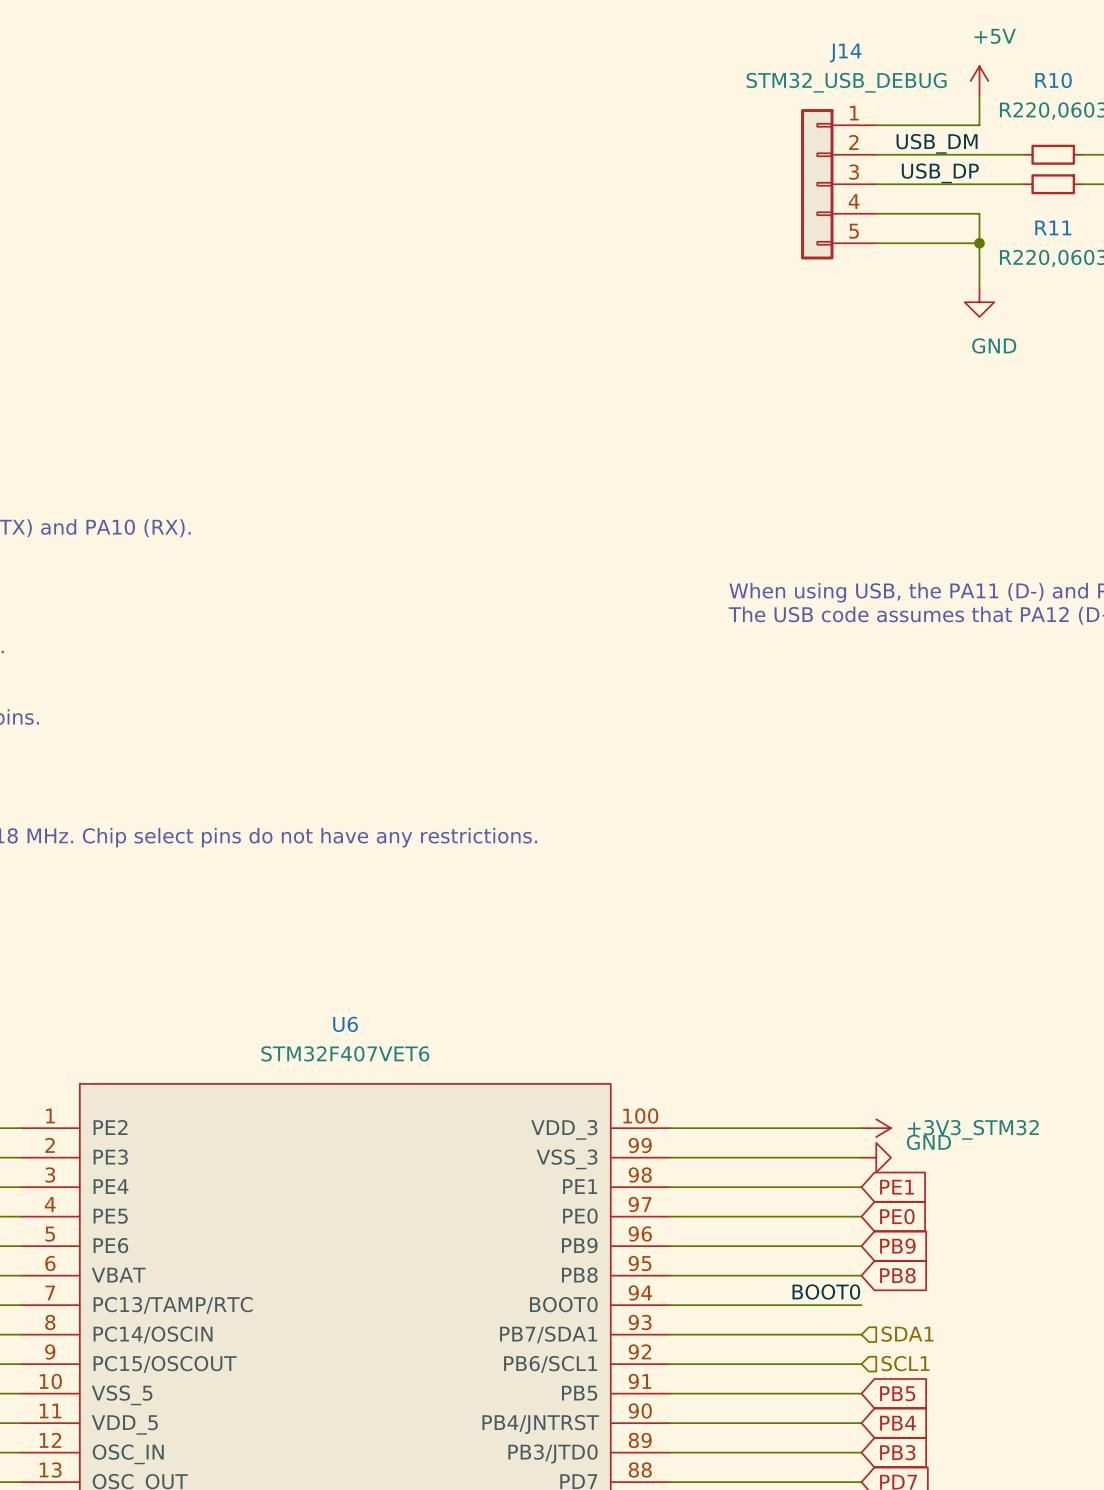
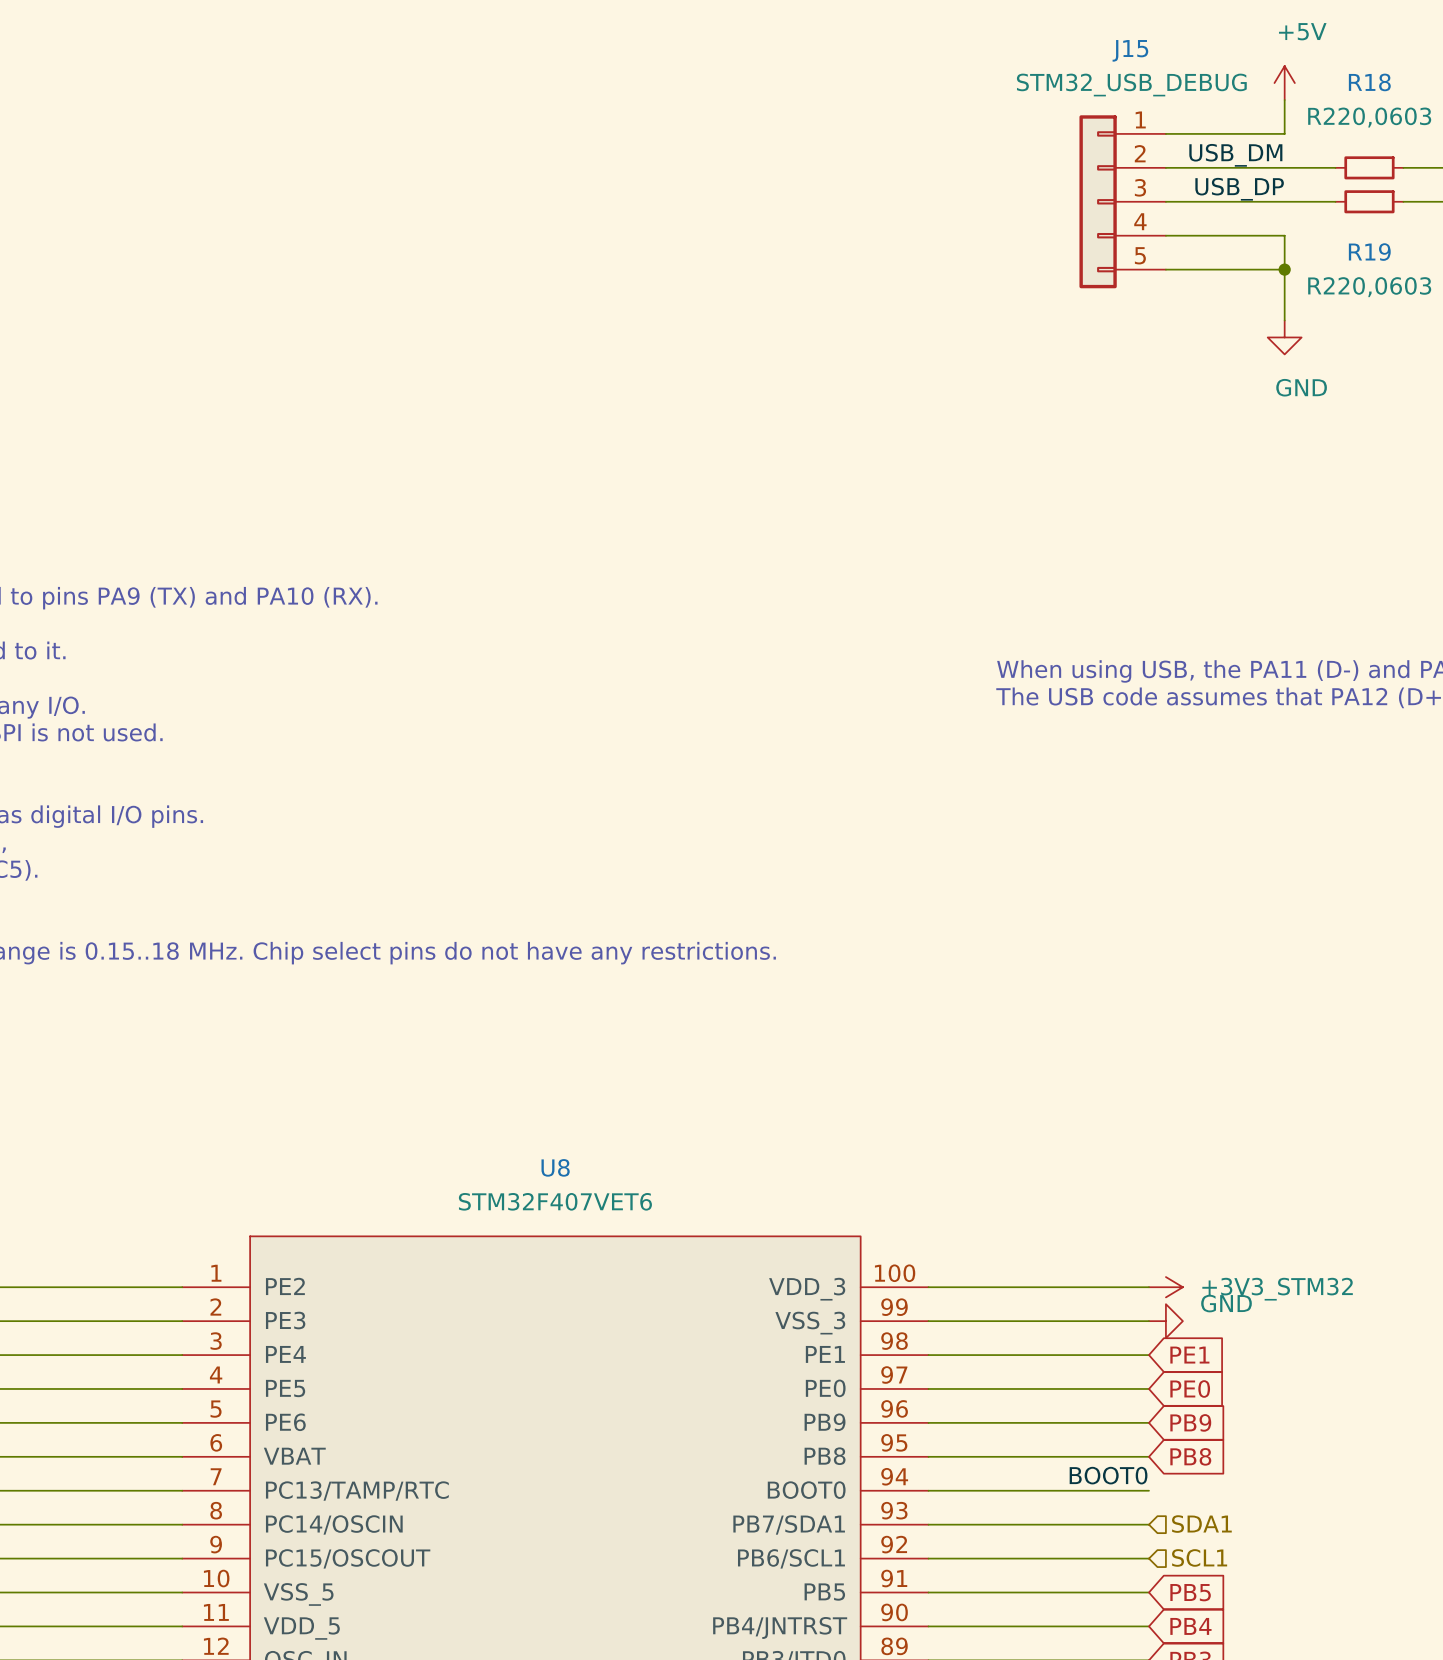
J14 name: J14 (845, 52) -> J15 (1130, 50)
R10 name: R10 (1053, 80) -> R18 (1369, 82)
R11 name: R11 (1053, 227) -> R19 (1369, 252)
U6 name: U6 (345, 1024) -> U8 (555, 1167)

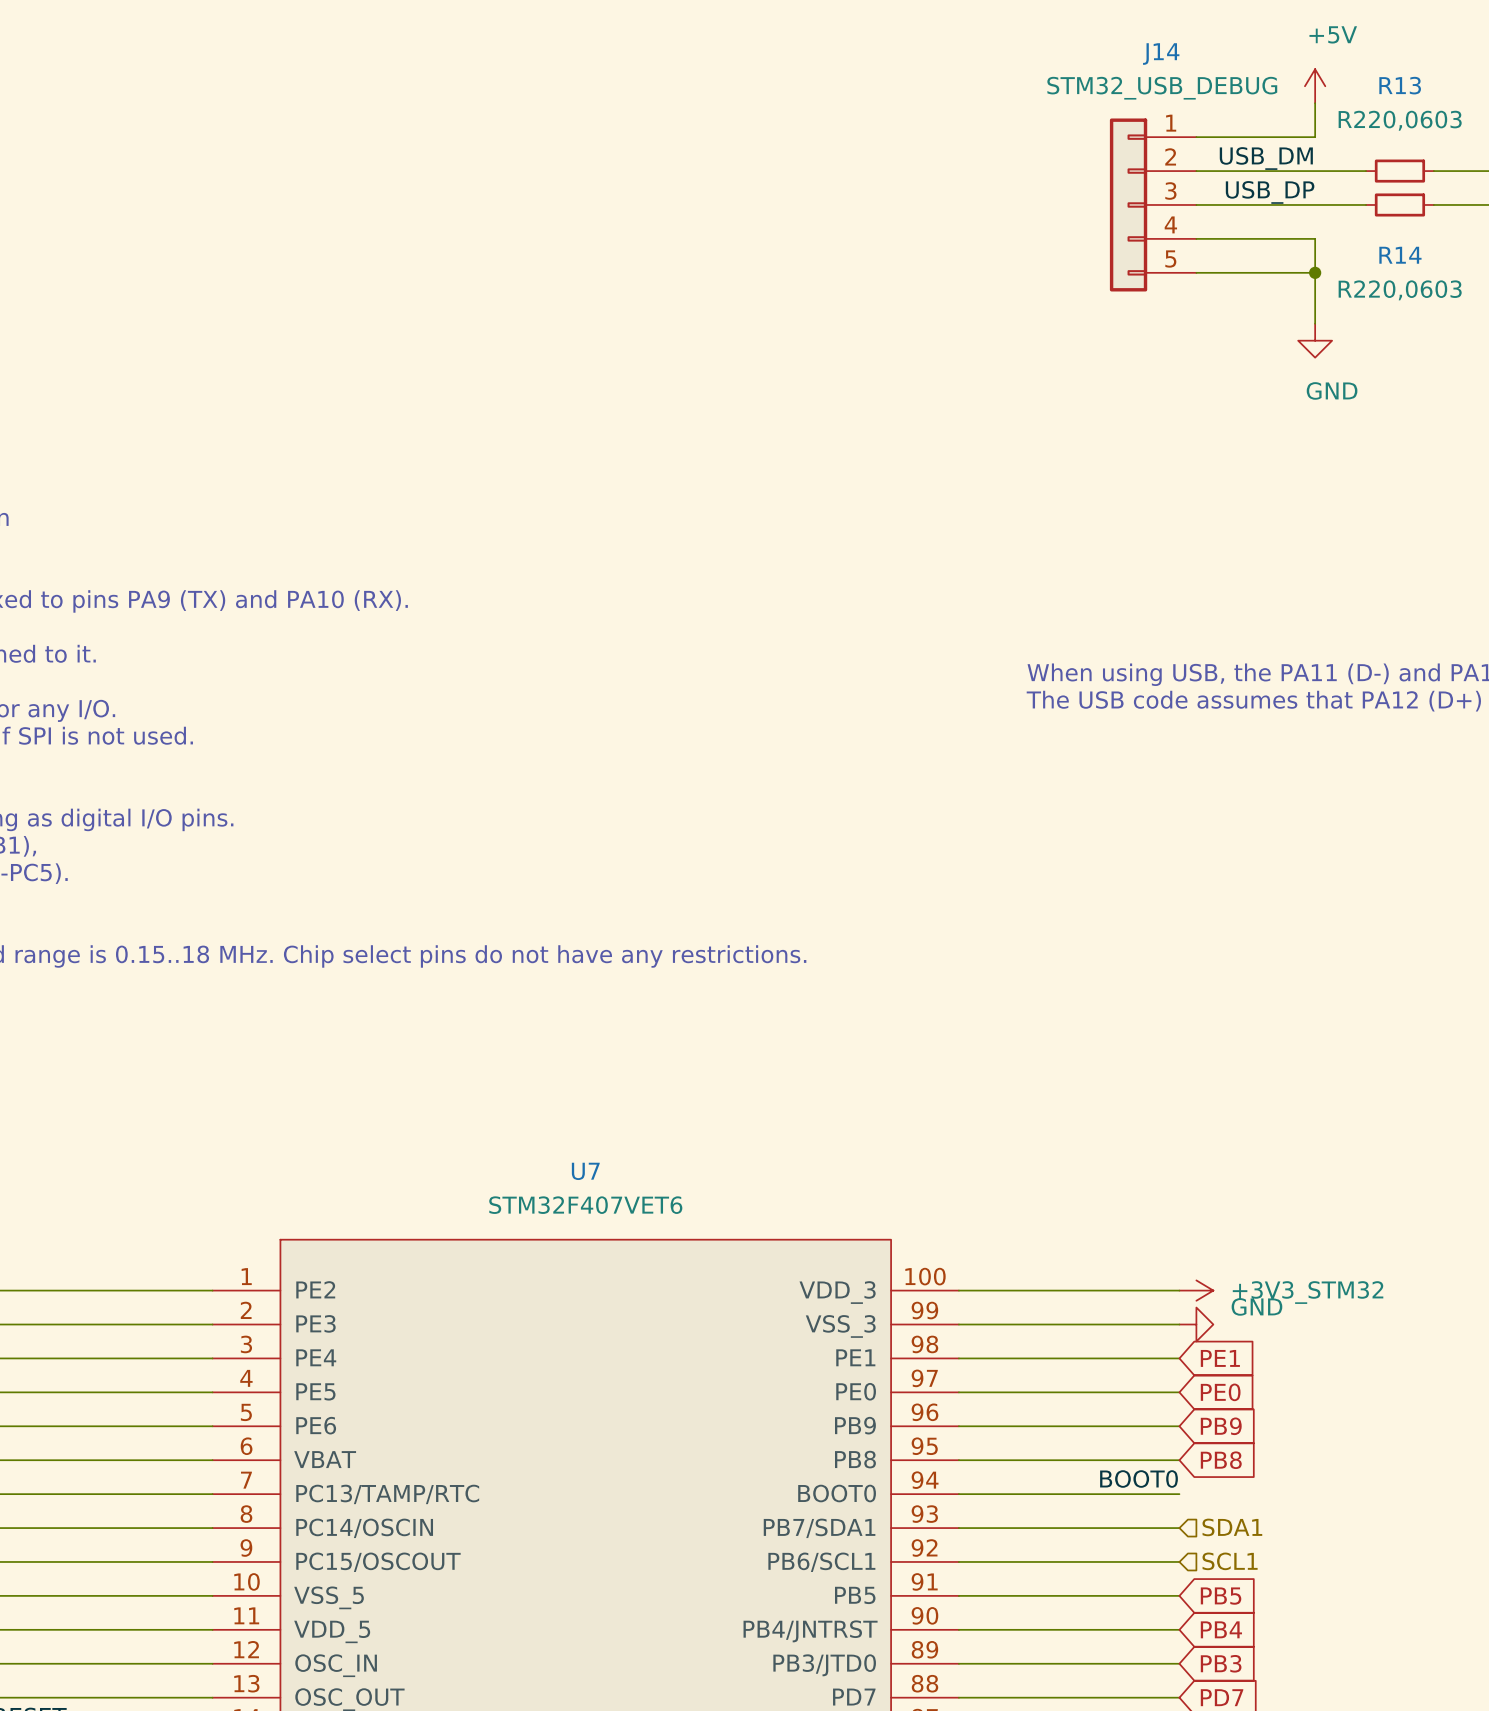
J15 name: J15 (1130, 50) -> J14 (1161, 54)
R18 name: R18 (1369, 82) -> R13 (1400, 85)
R19 name: R19 (1369, 252) -> R14 (1400, 255)
U8 name: U8 (555, 1167) -> U7 (585, 1171)

